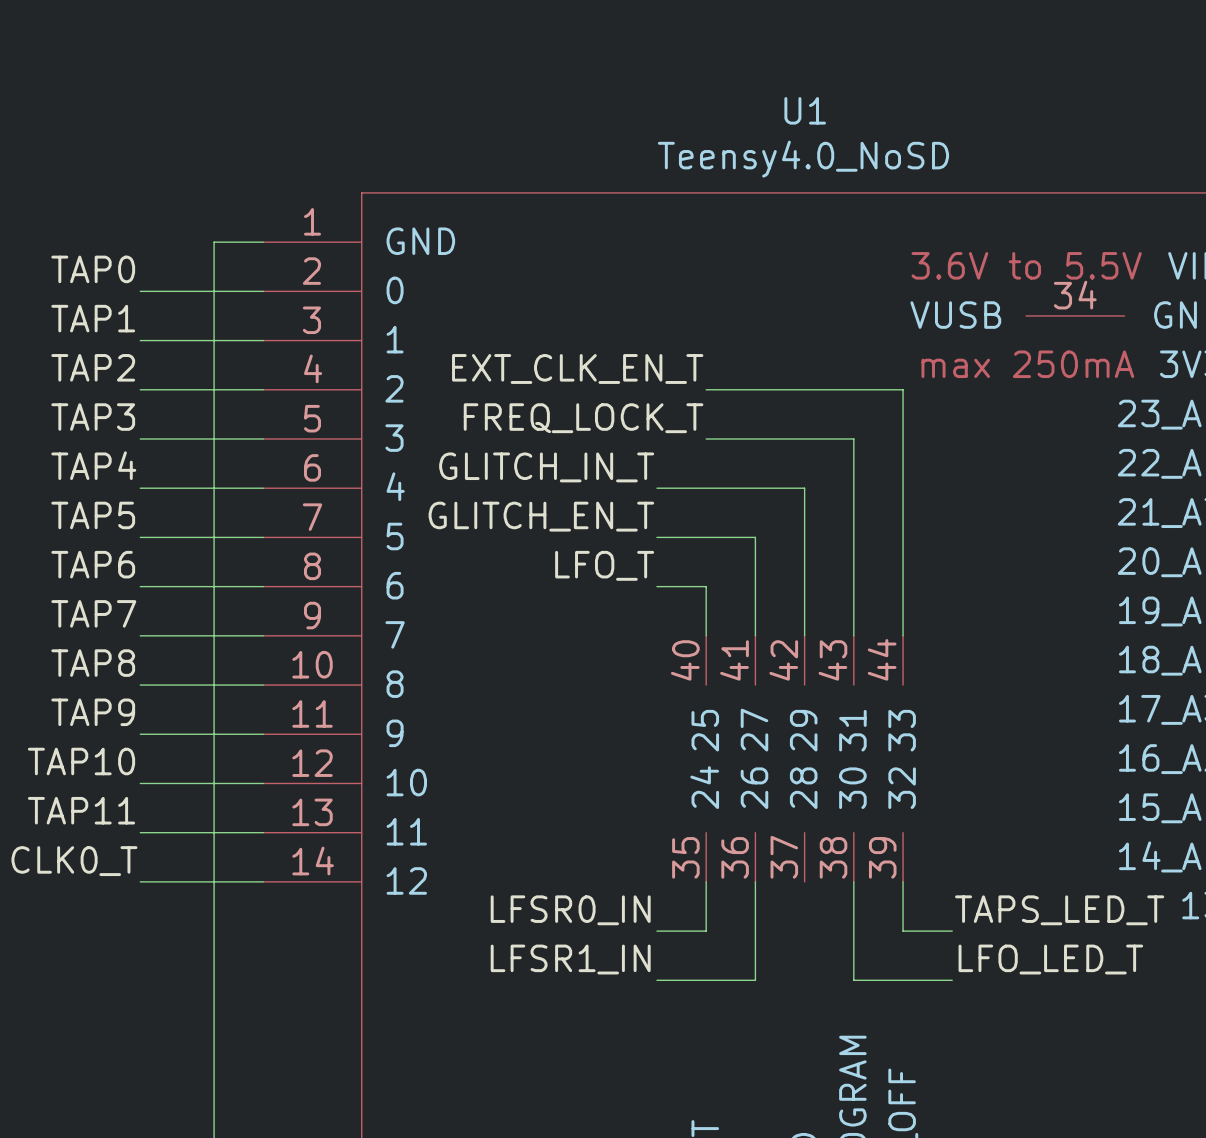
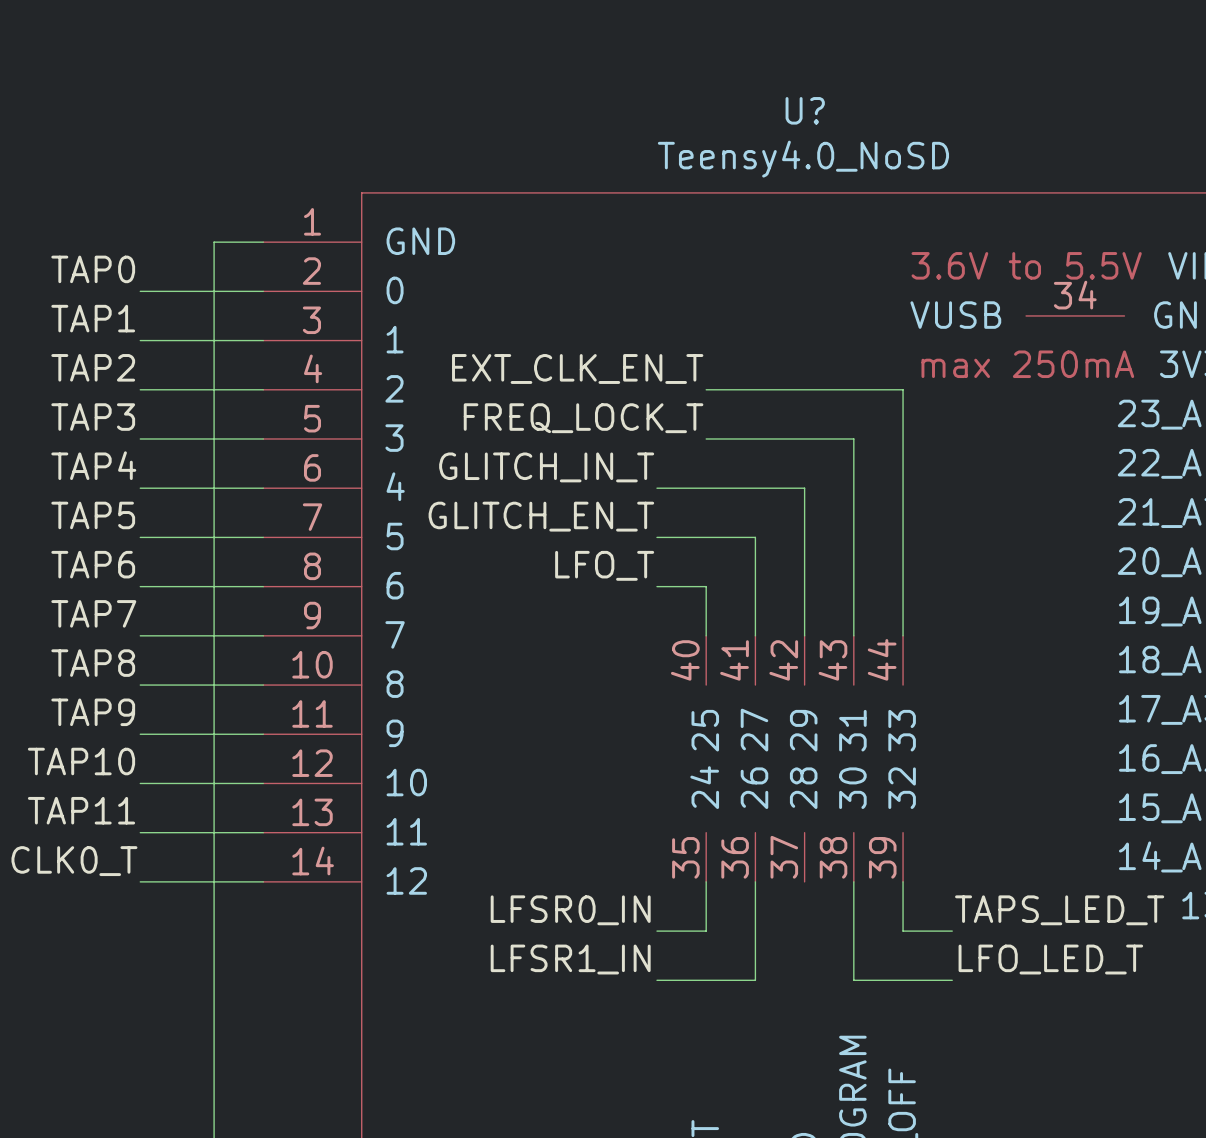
U1 name: U1 (805, 110) -> U? (805, 110)

